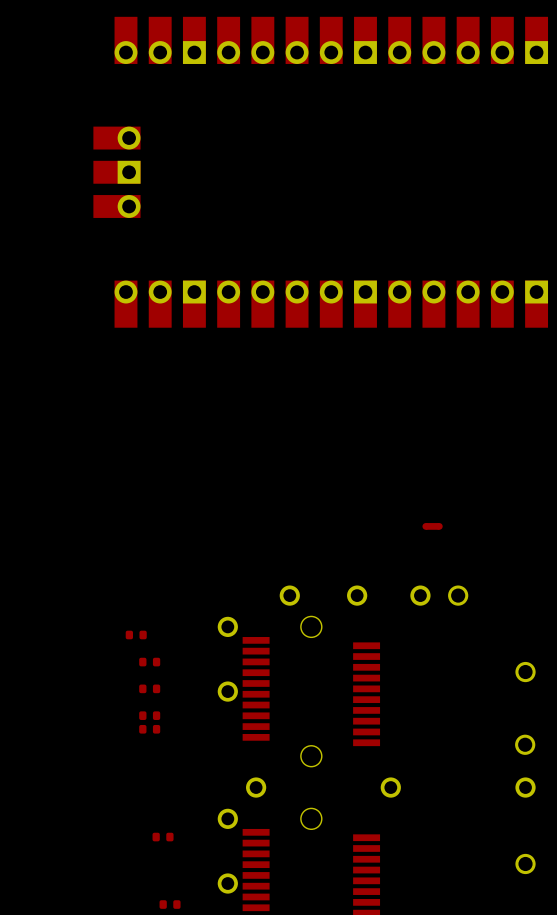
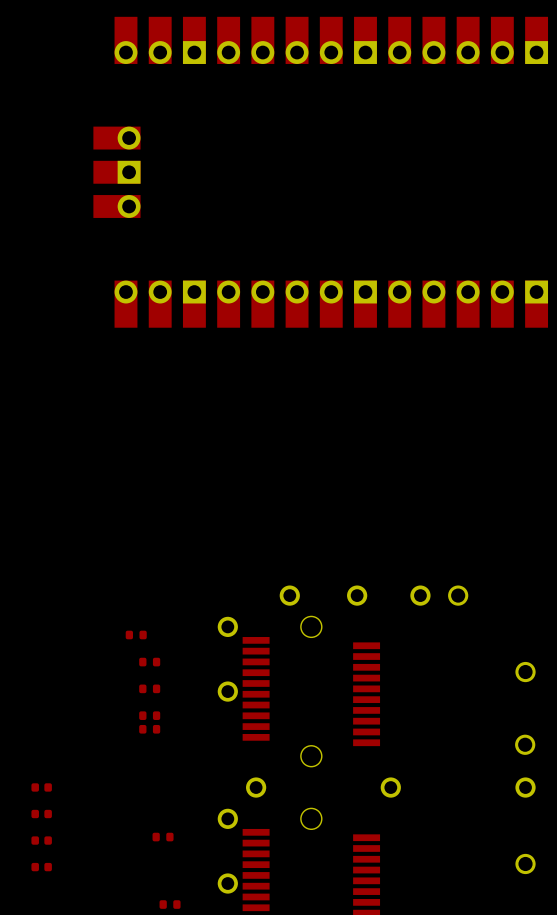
part: (432, 526) -> none
part: none -> (41, 787)
part: none -> (41, 814)
part: none -> (41, 840)
part: none -> (41, 867)

